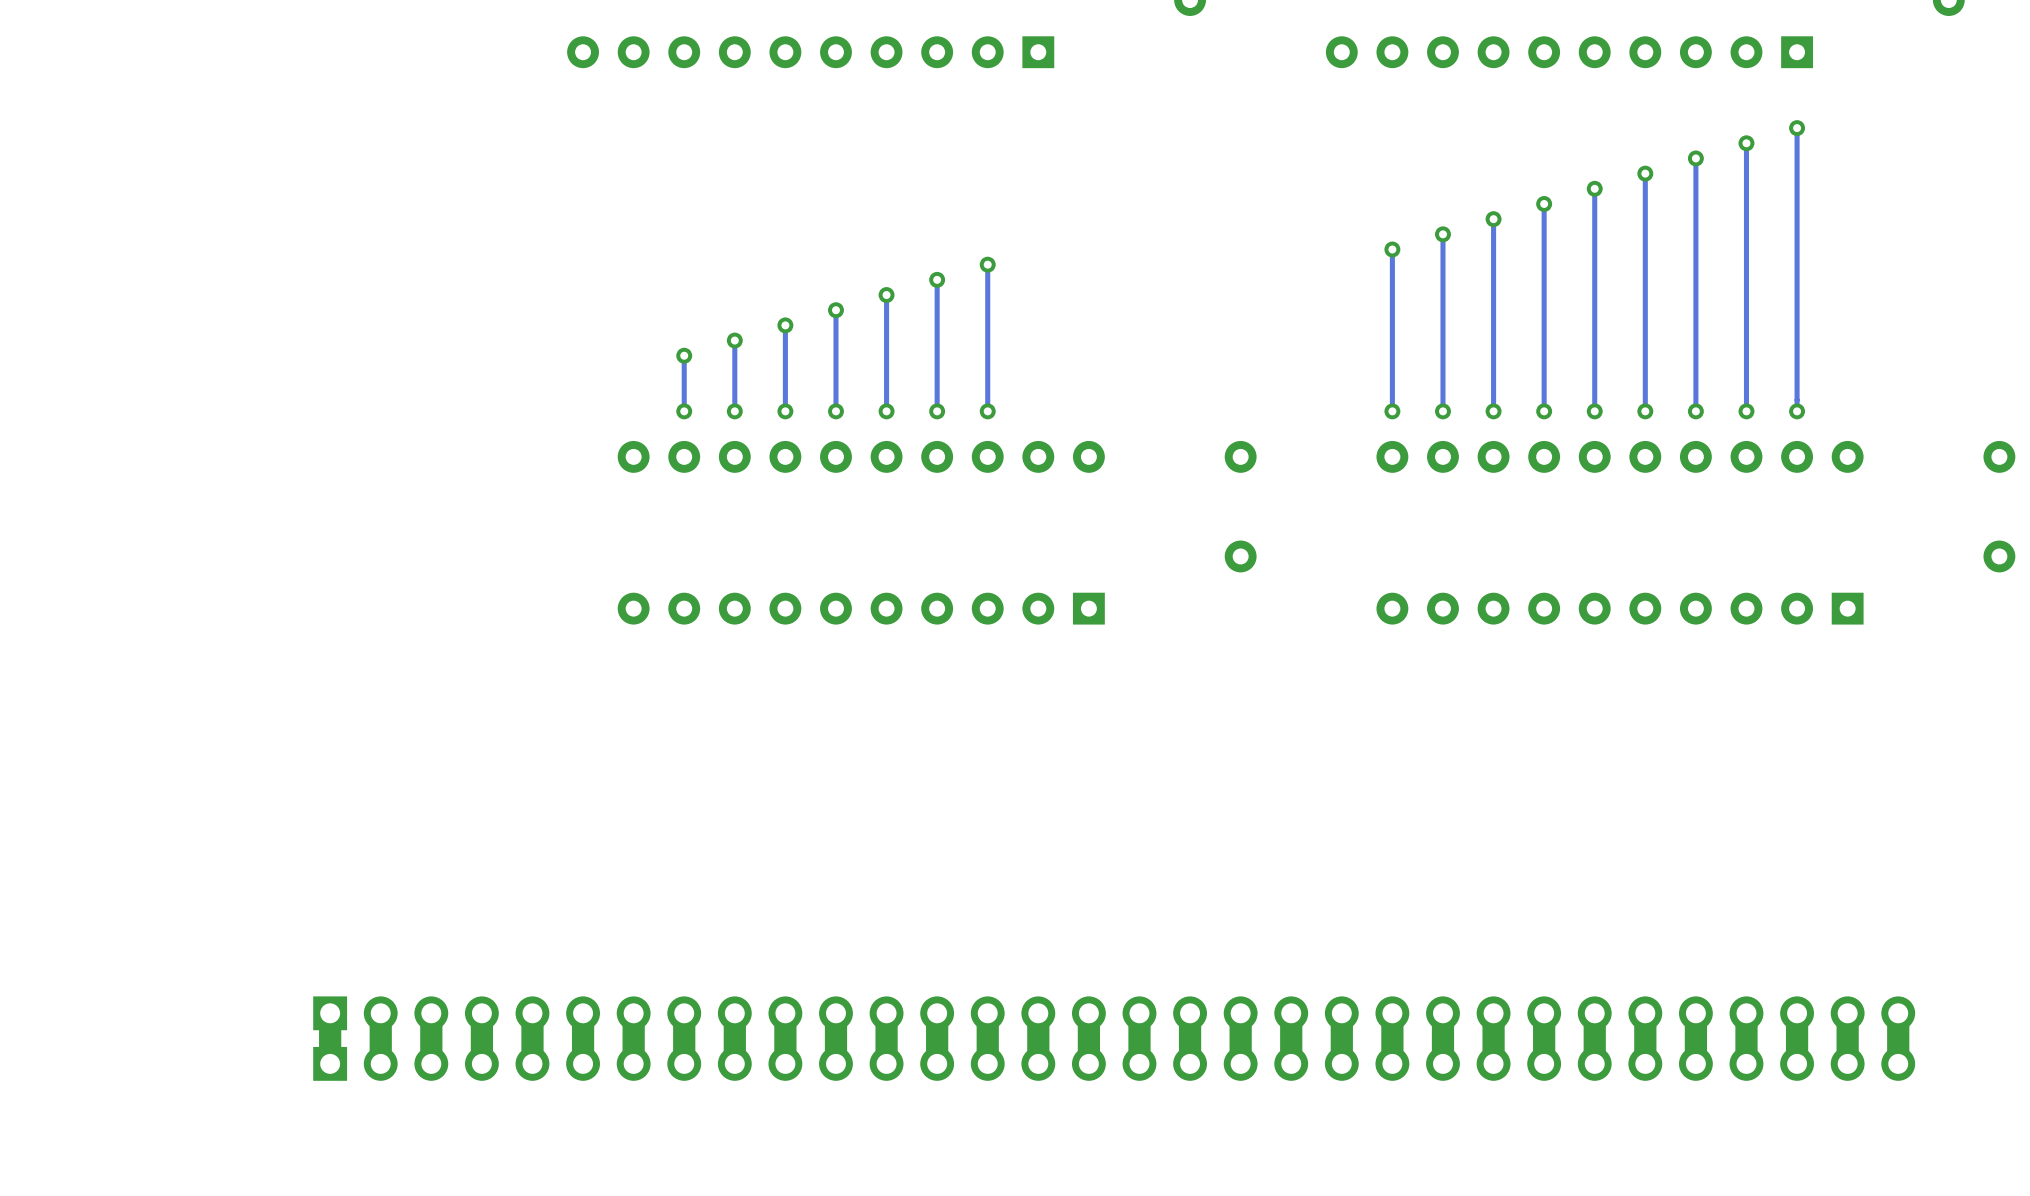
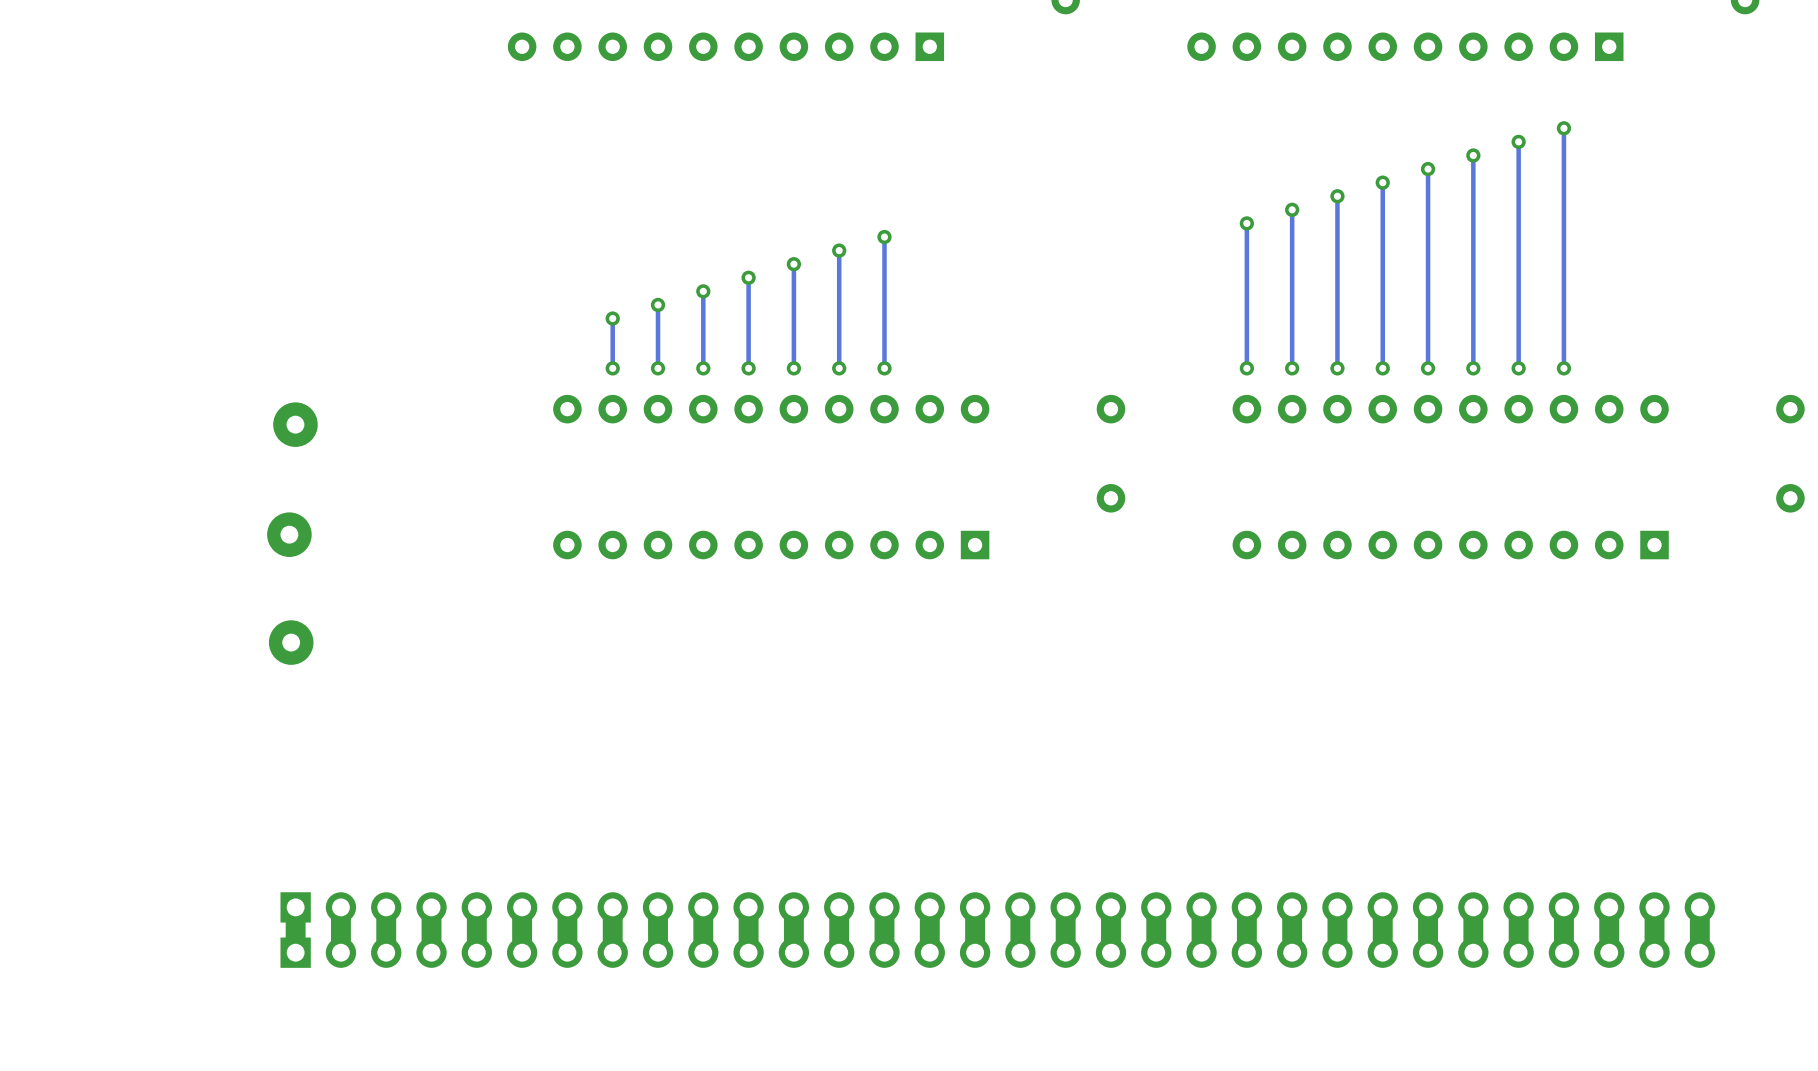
track: (1797, 128) (1797, 411) -> none
via: (1797, 128) -> none
via: (1797, 411) -> none
part: none -> (295, 424)
part: none -> (289, 534)
part: none -> (291, 642)

